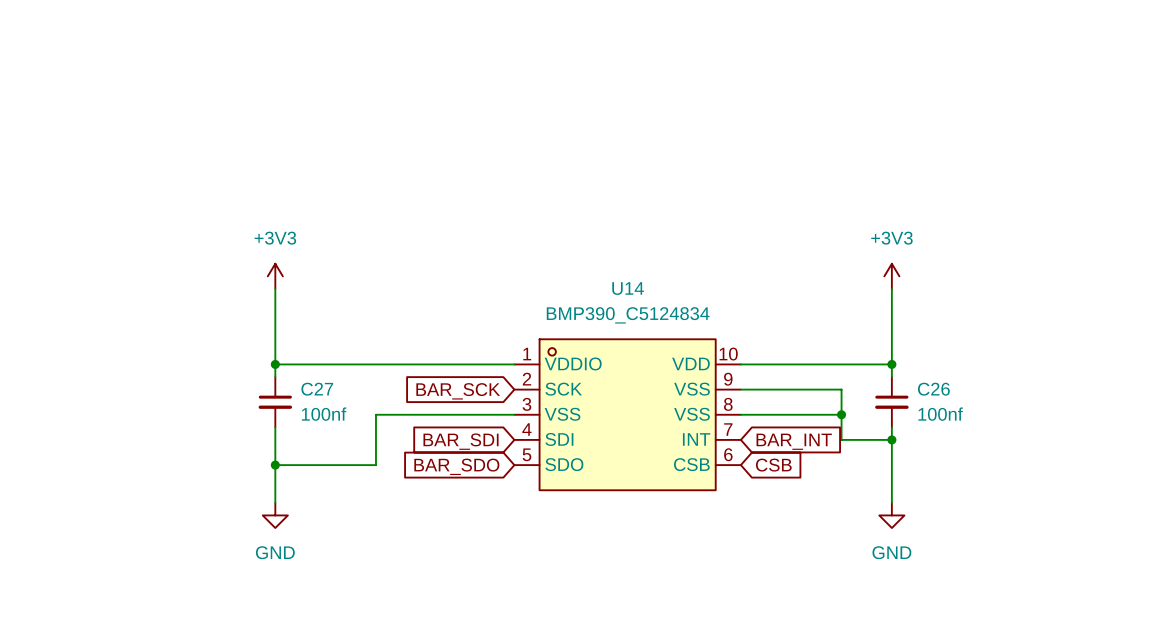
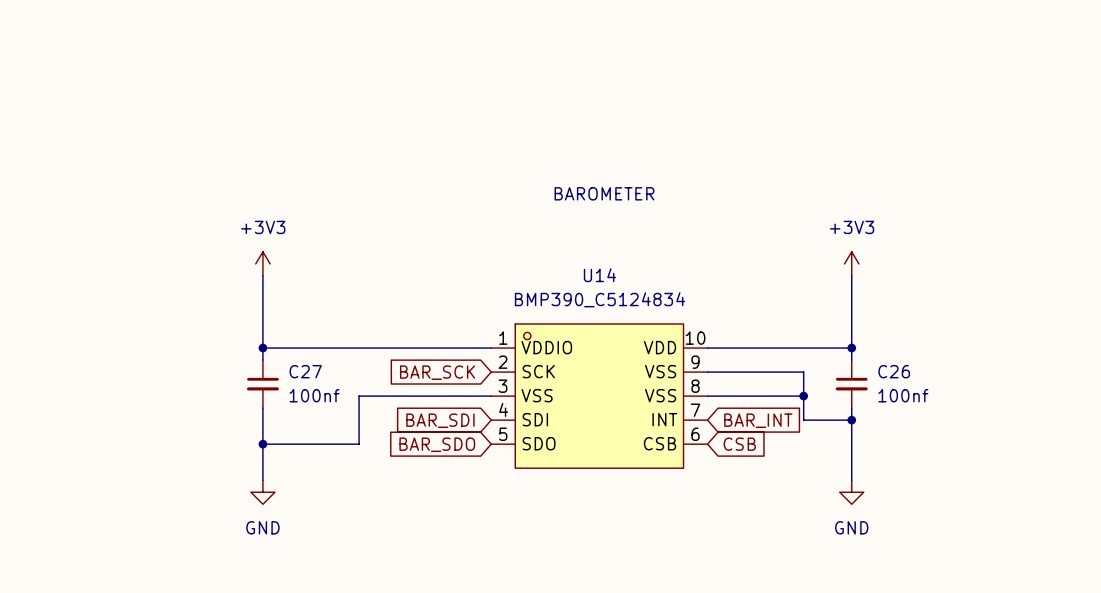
text: none -> BAROMETER (604, 193)

